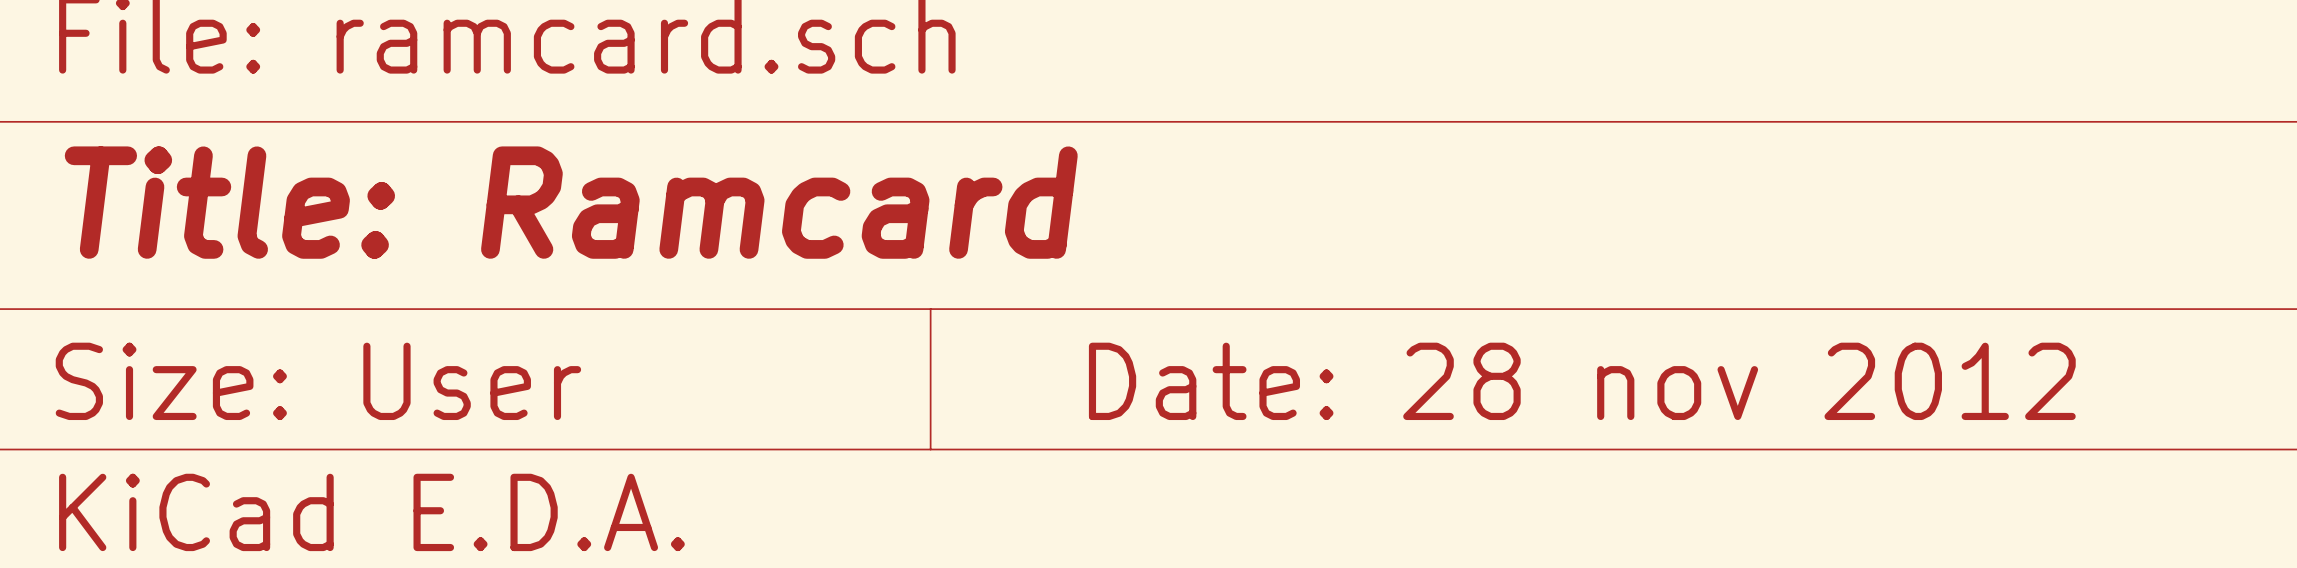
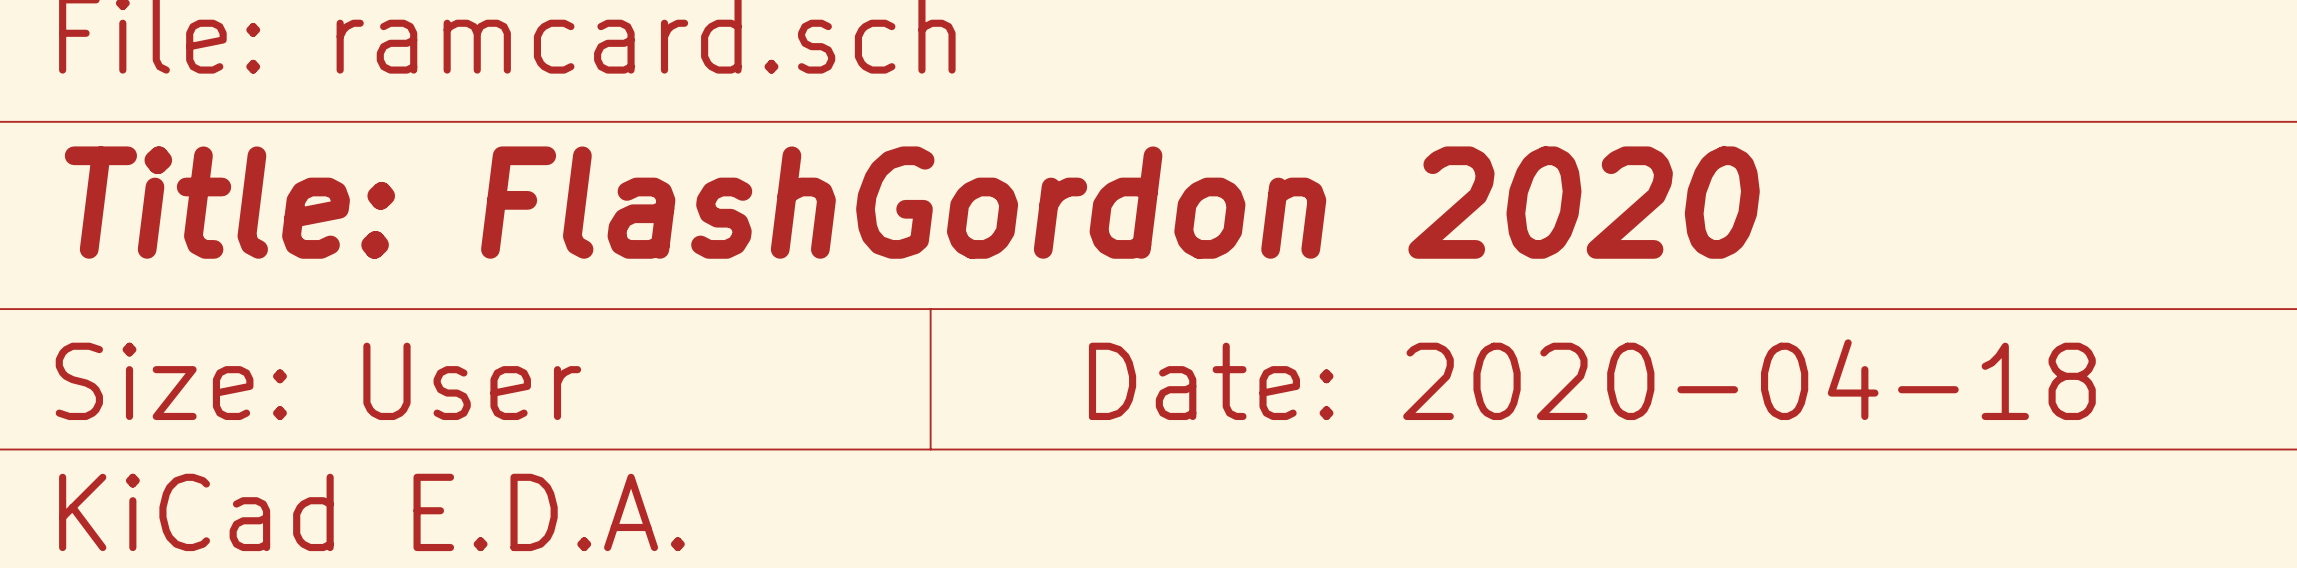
title block: Title: Ramcard (571, 202) -> Title: FlashGordon 2020 (912, 202)
title block: Date: 28 nov 2012 (1582, 381) -> Date: 2020-04-18 (1592, 379)

